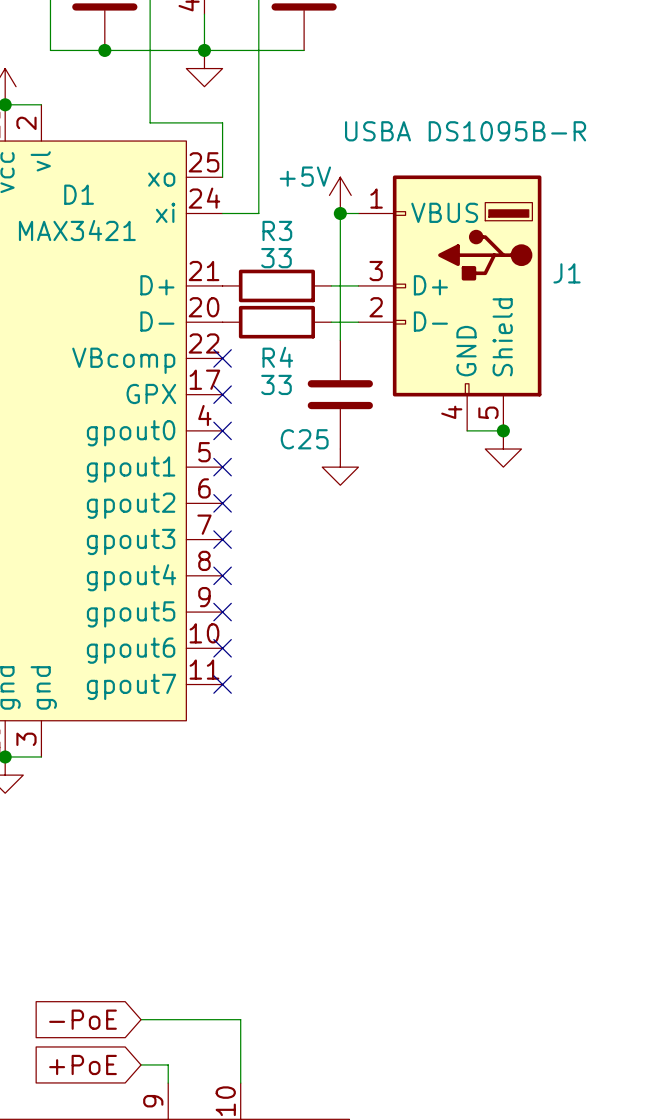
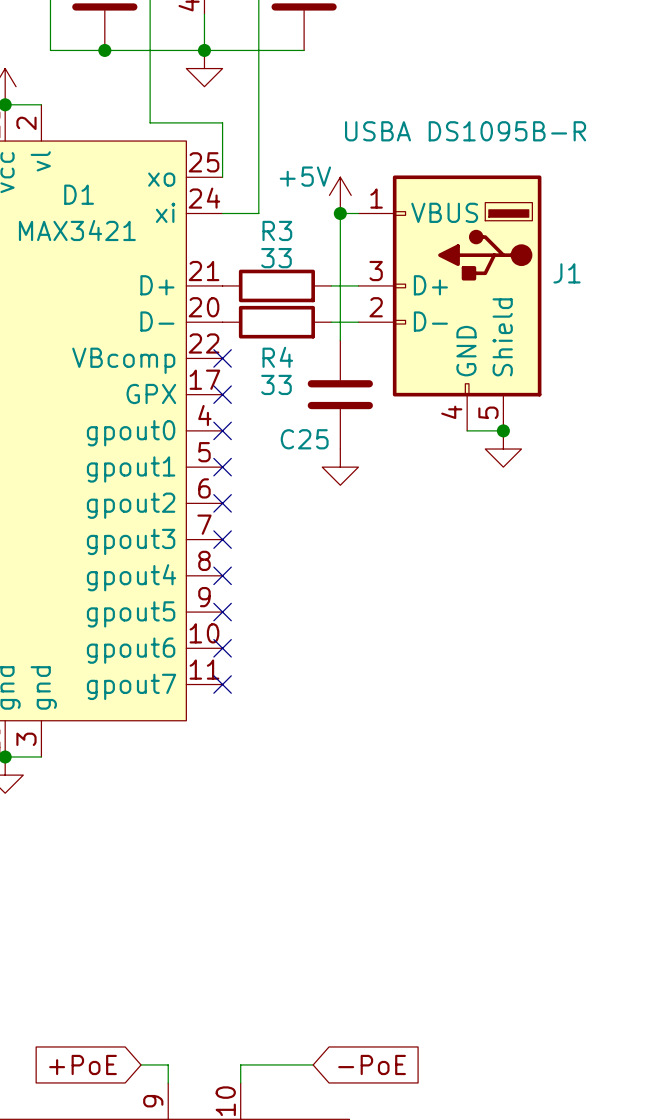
global label rotation: 0° (83, 1019) -> 180° (372, 1064)
global label position: -PoE (83, 1019) -> -PoE (372, 1064)
wire: (141, 1019) (240, 1019) (240, 1064) -> (313, 1064) (240, 1064)

